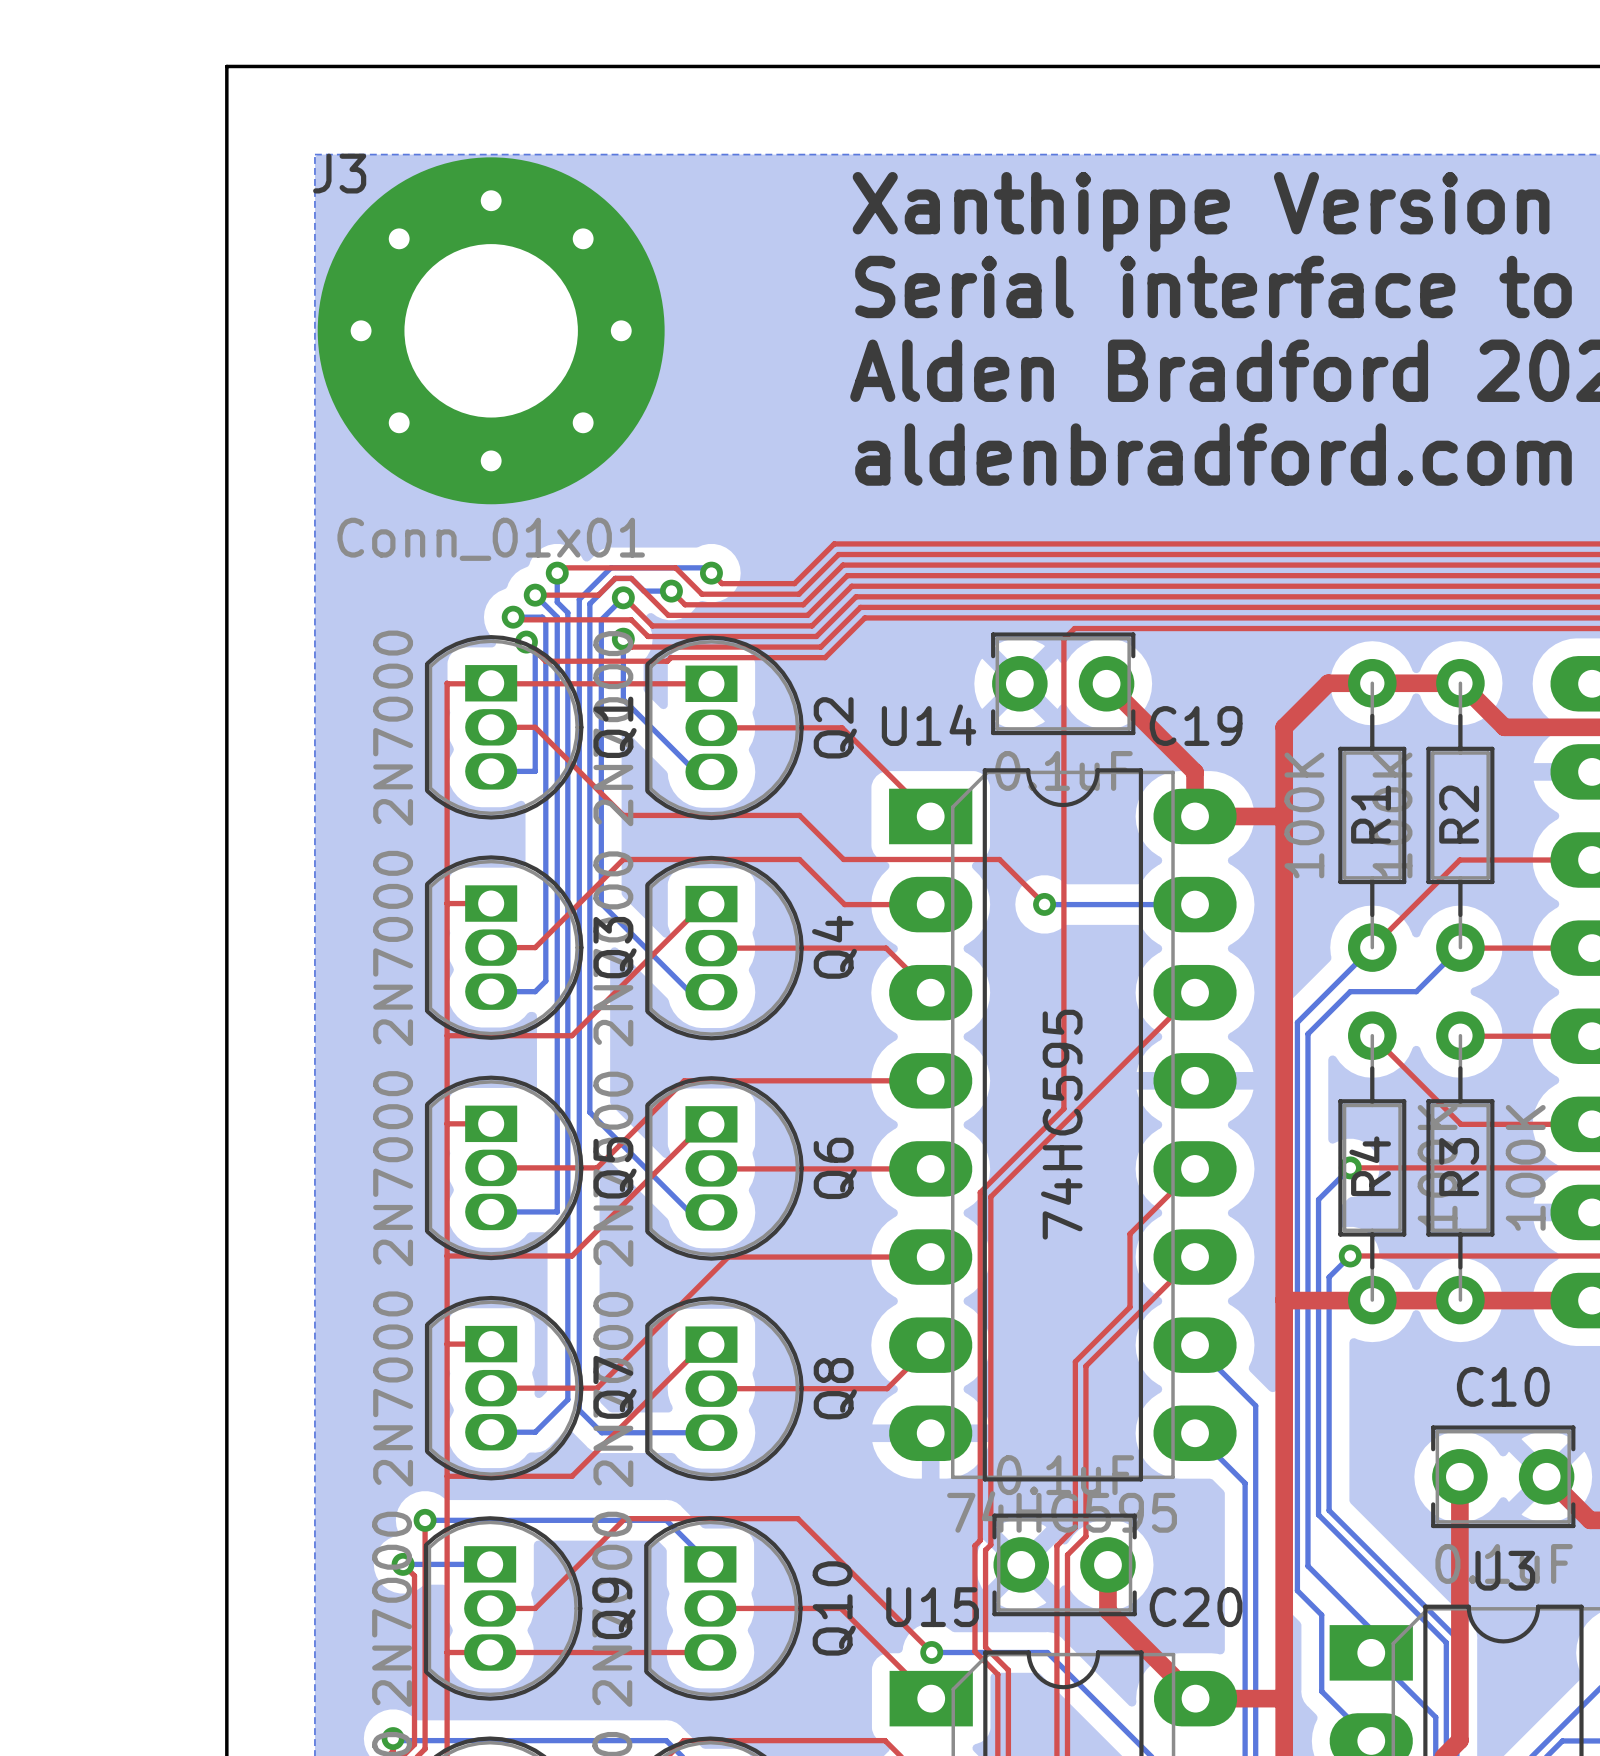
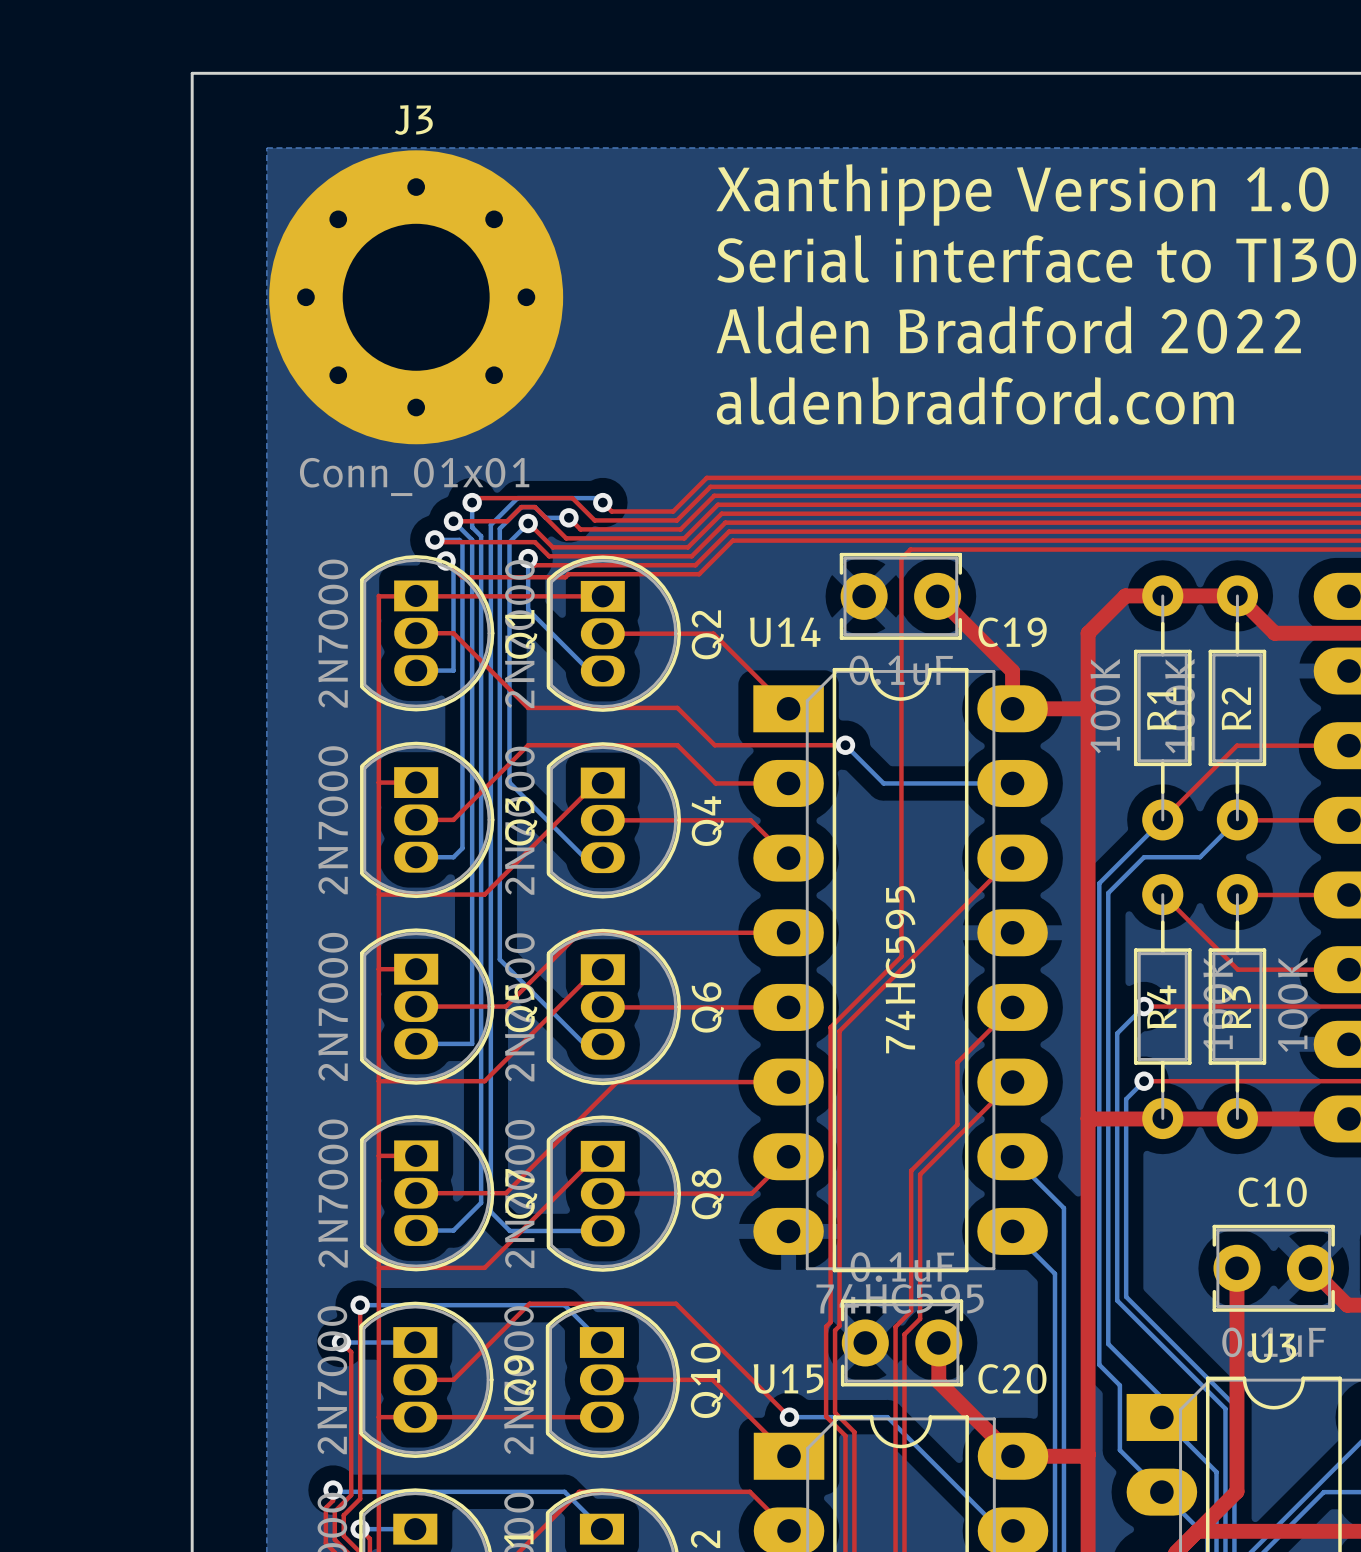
J3 name position: J3 (339, 173) -> J3 (413, 119)
top track: (997, 859) (1044, 904) -> none
bottom track: none -> (845, 745) (885, 783)
via position: (1044, 904) -> (845, 745)

